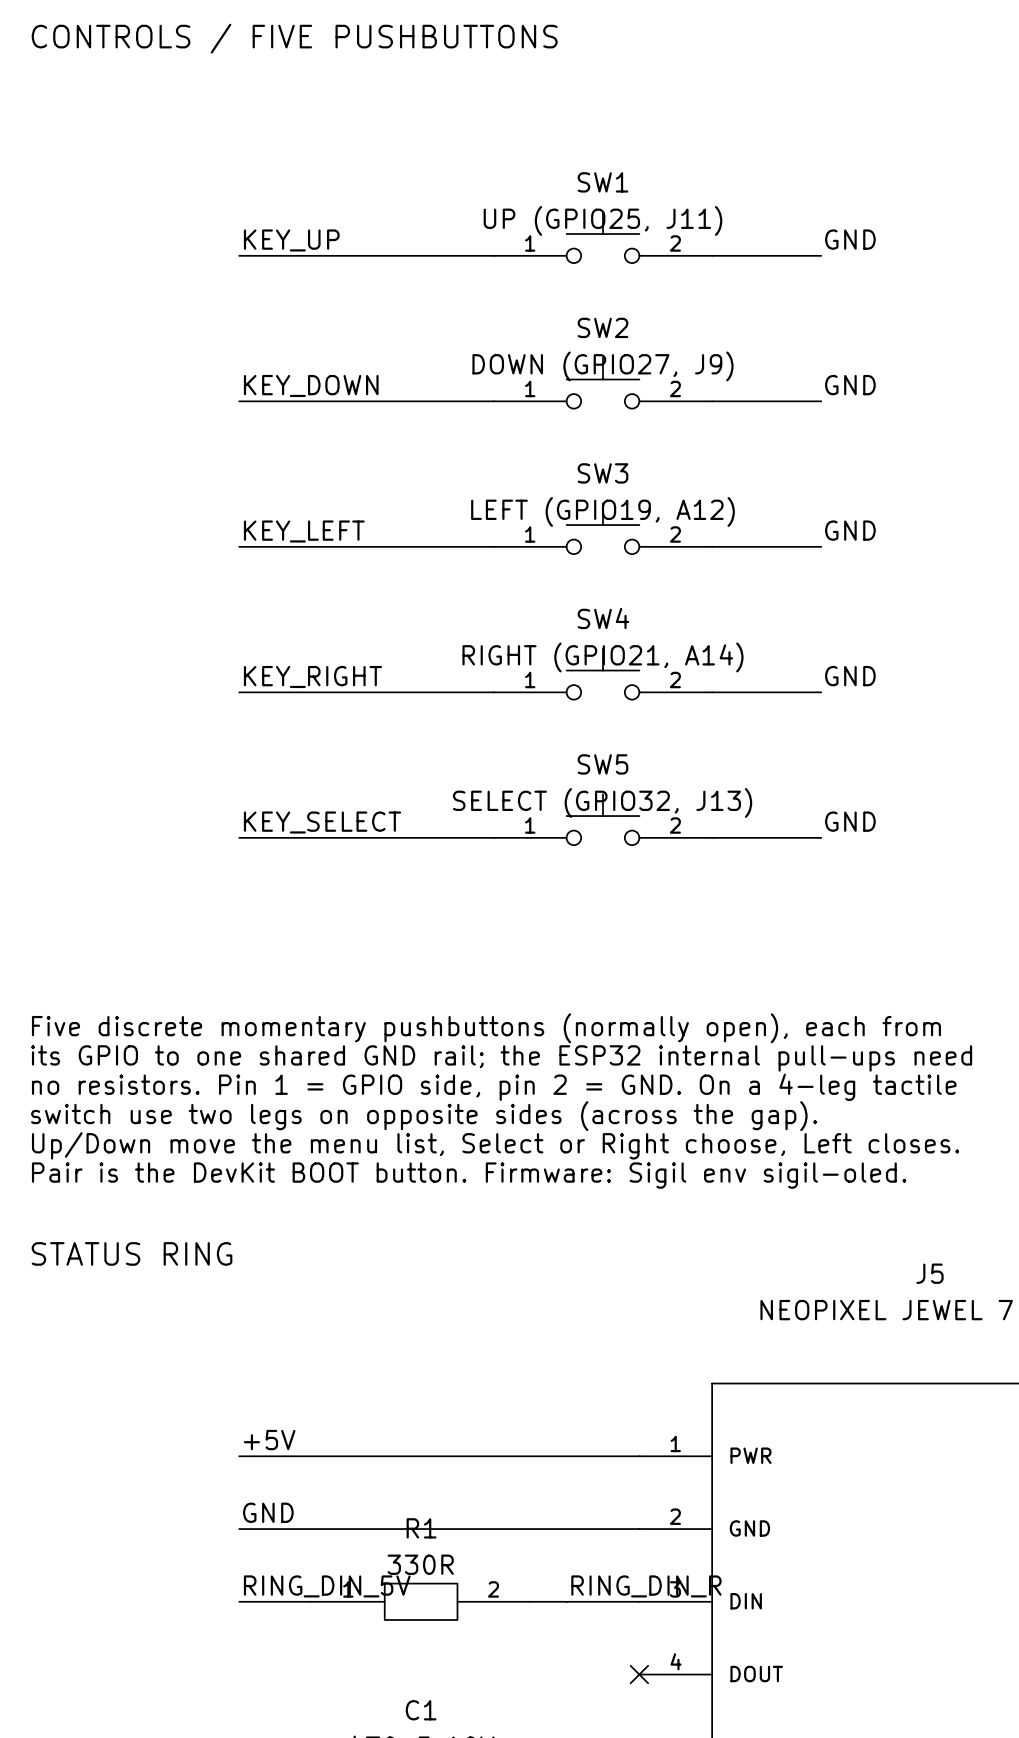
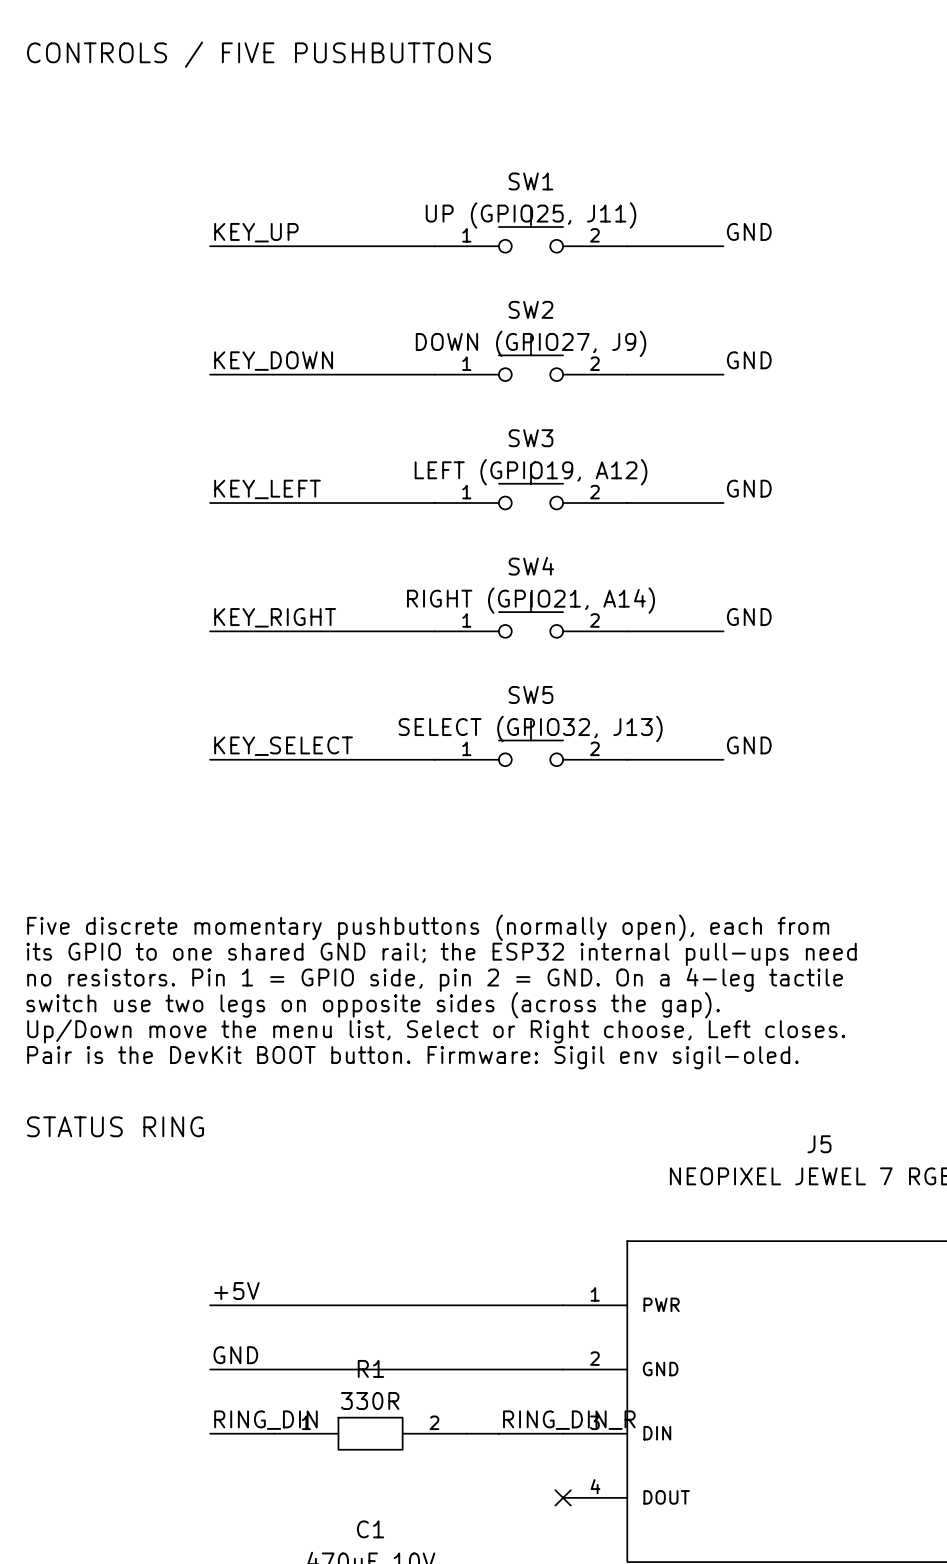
label: RING_DIN_5V (327, 1586) -> RING_DIN (265, 1420)

